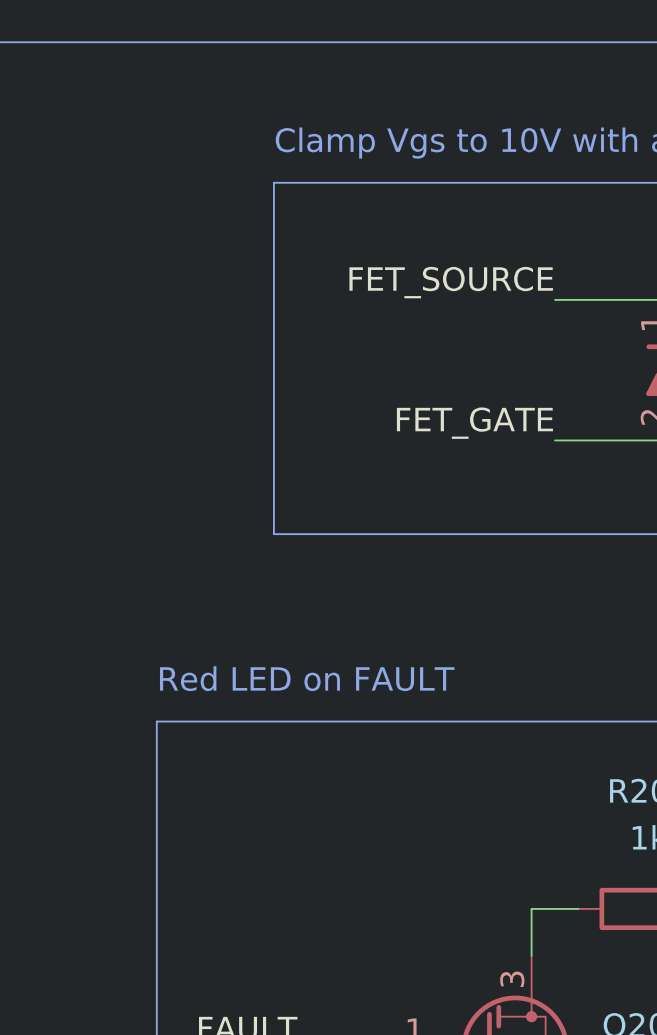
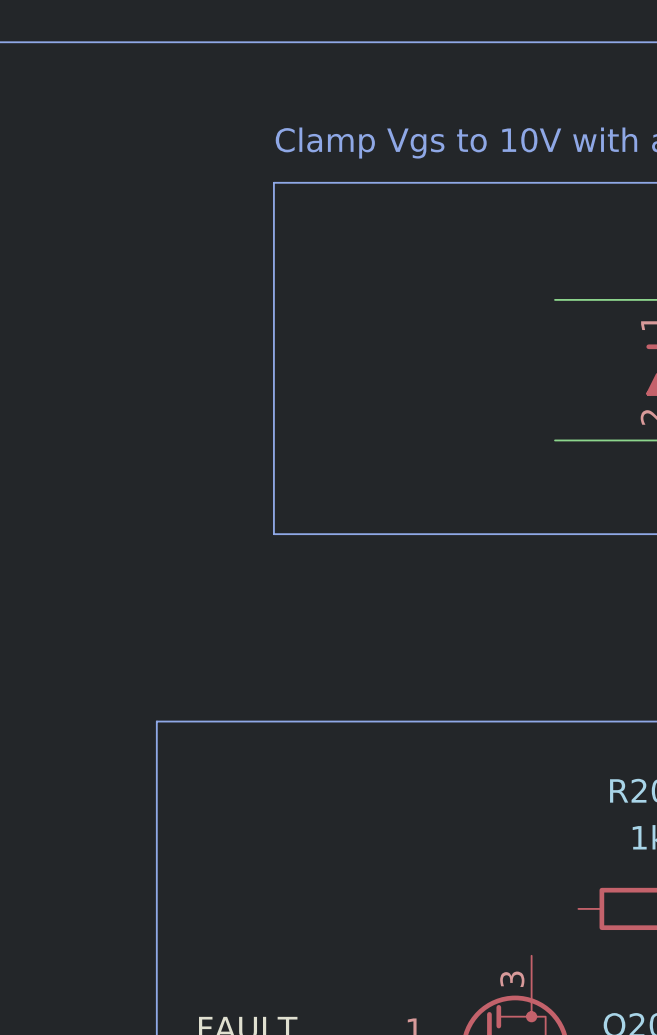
label: FET_SOURCE (451, 282) -> none
label: FET_GATE (474, 423) -> none
text: Red LED on FAULT (307, 678) -> none
wire: (578, 908) (531, 908) (531, 955) -> none

